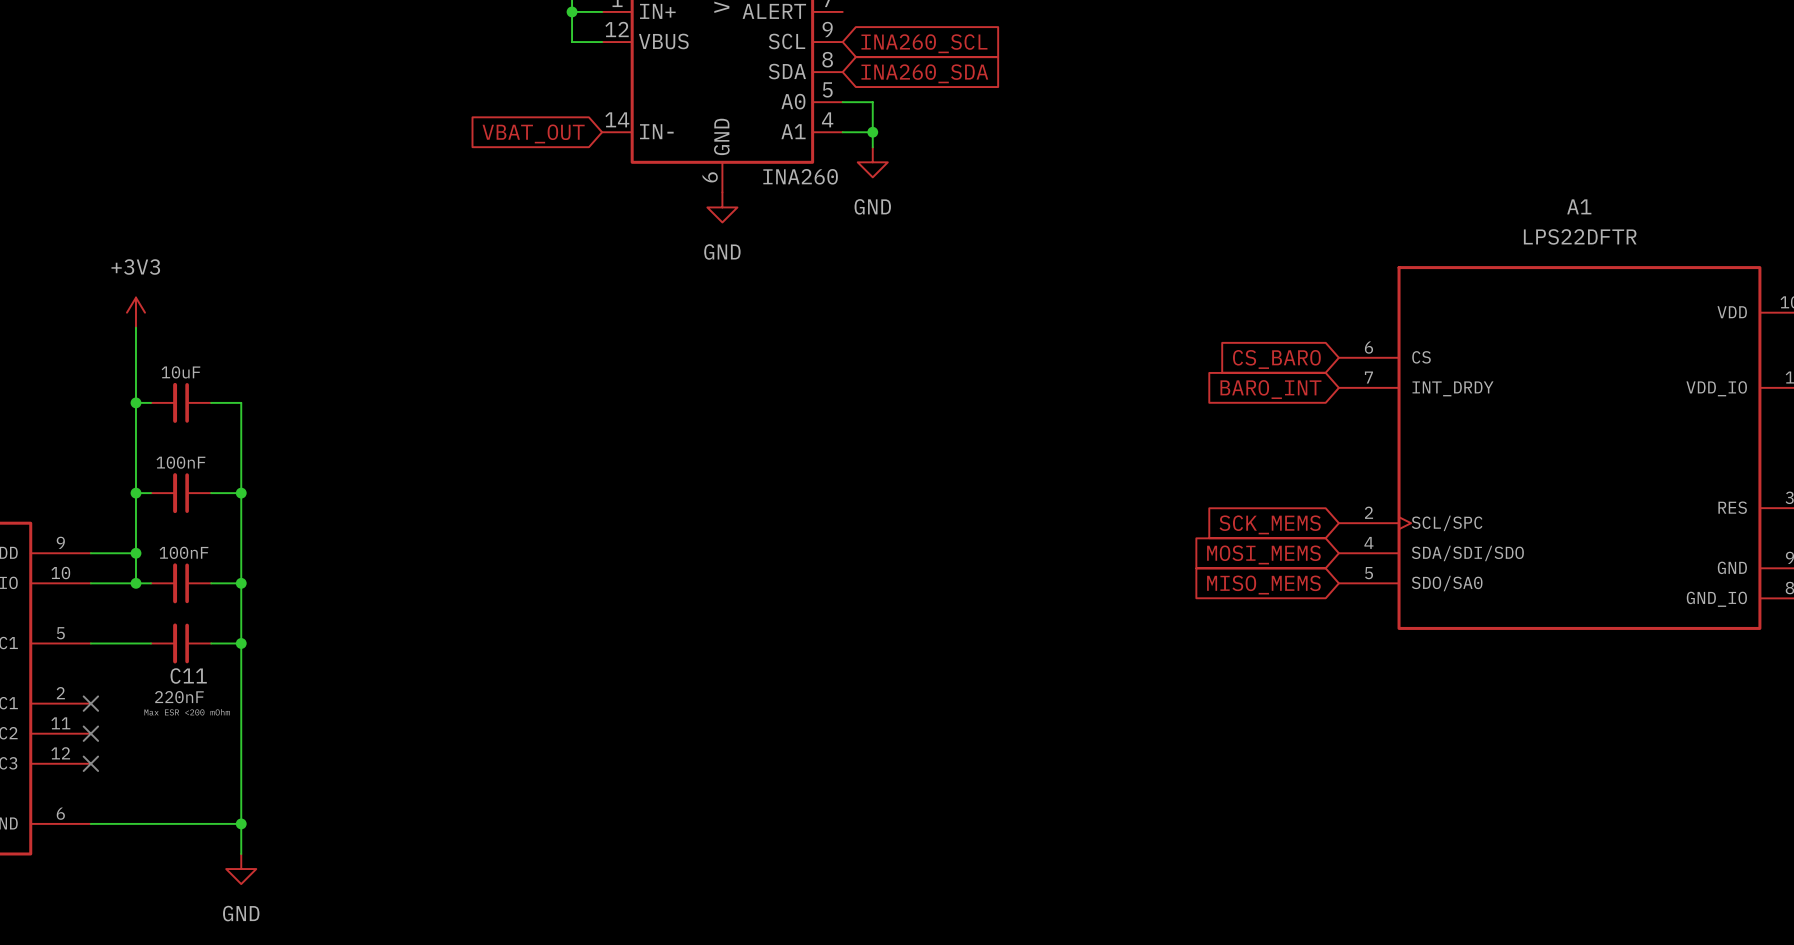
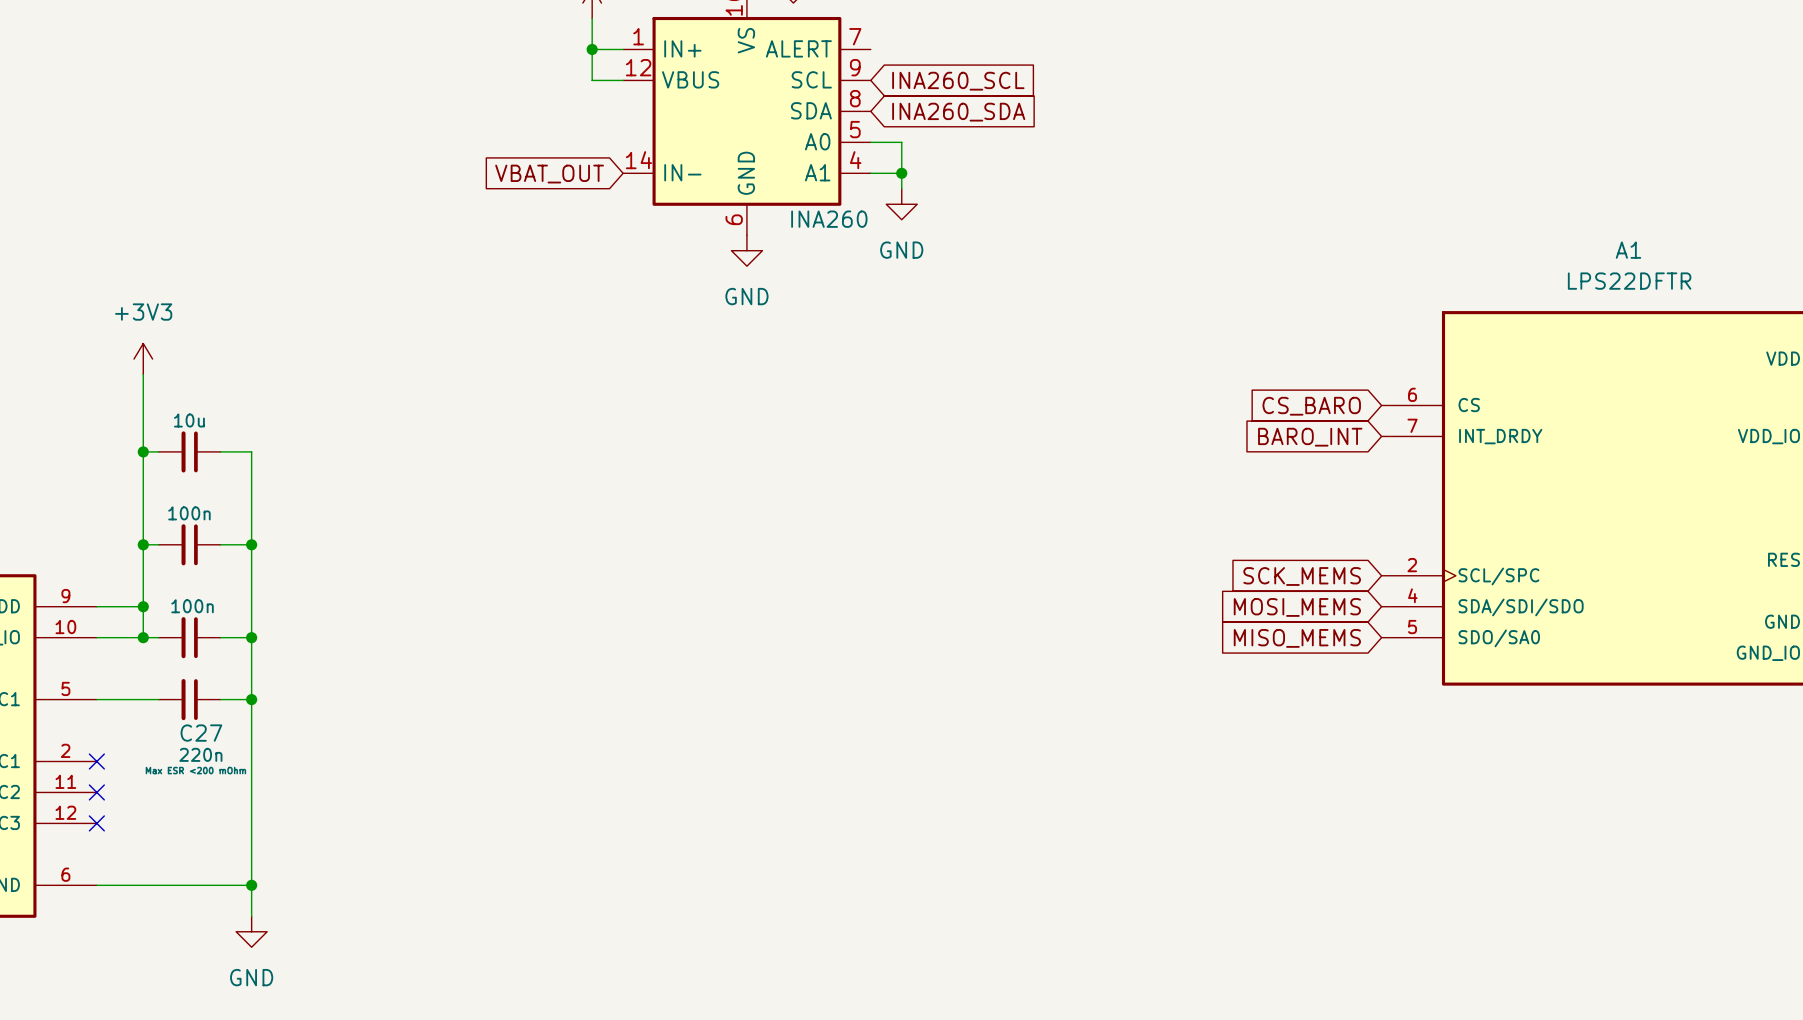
part value: 10uF (180, 372) -> 10u (189, 420)
part value: 100nF (180, 462) -> 100n (189, 513)
part value: 100nF (183, 552) -> 100n (192, 606)
C11 name: C11 (188, 676) -> C27 (201, 733)
C11 value: 220nF (179, 697) -> 220n (200, 754)

